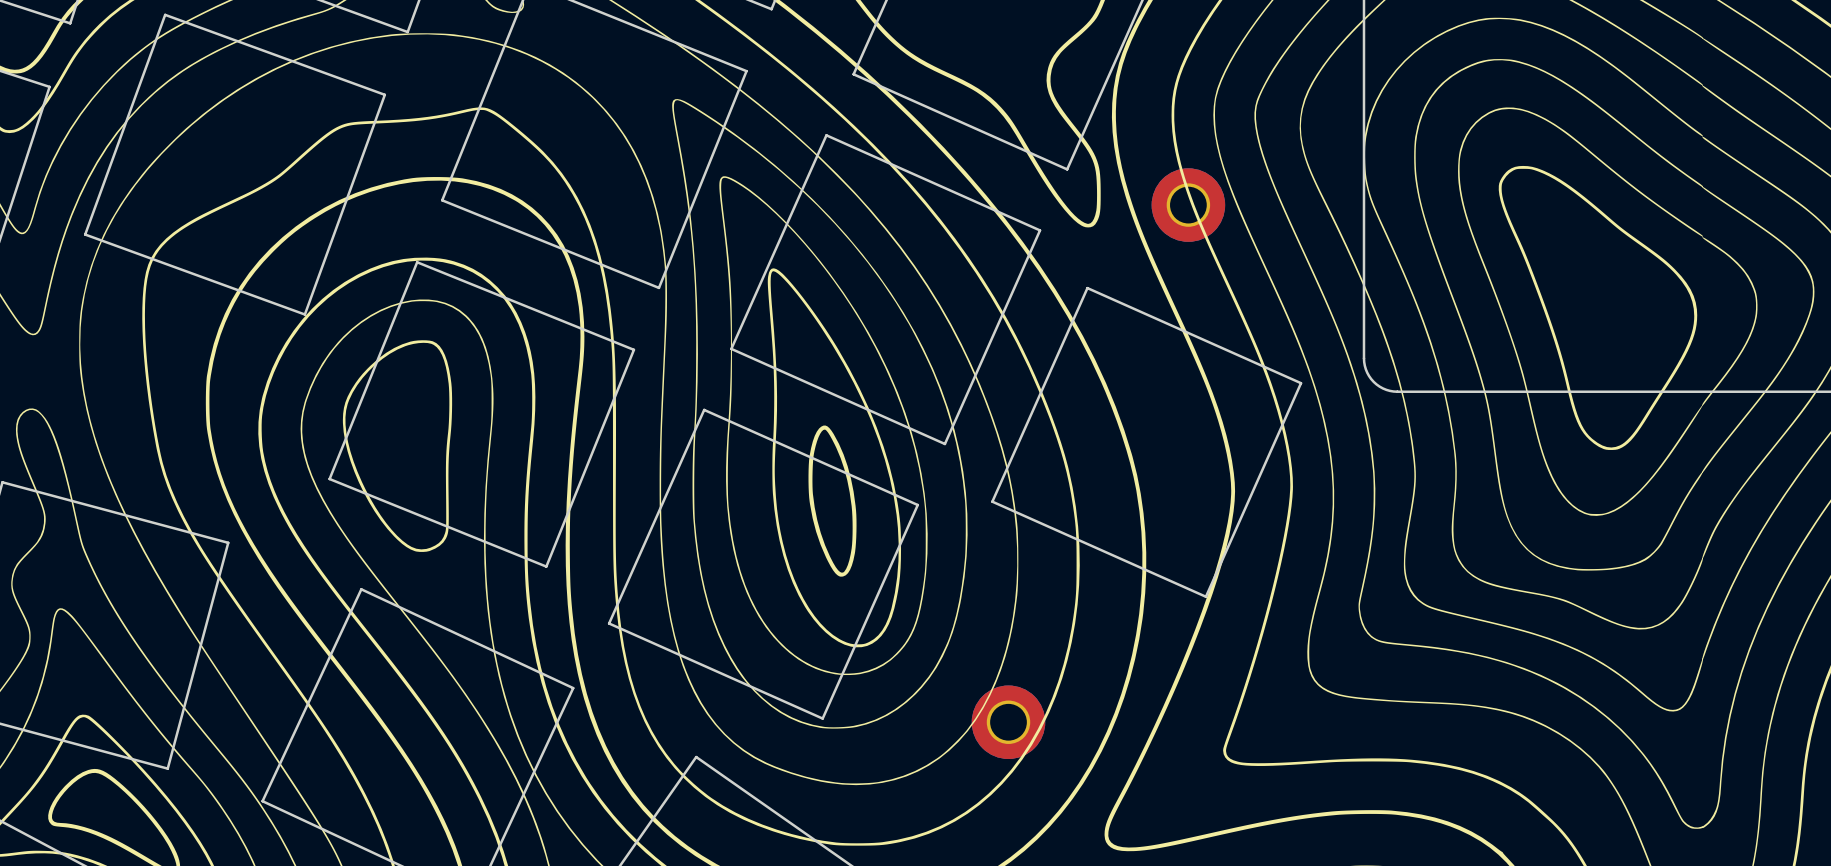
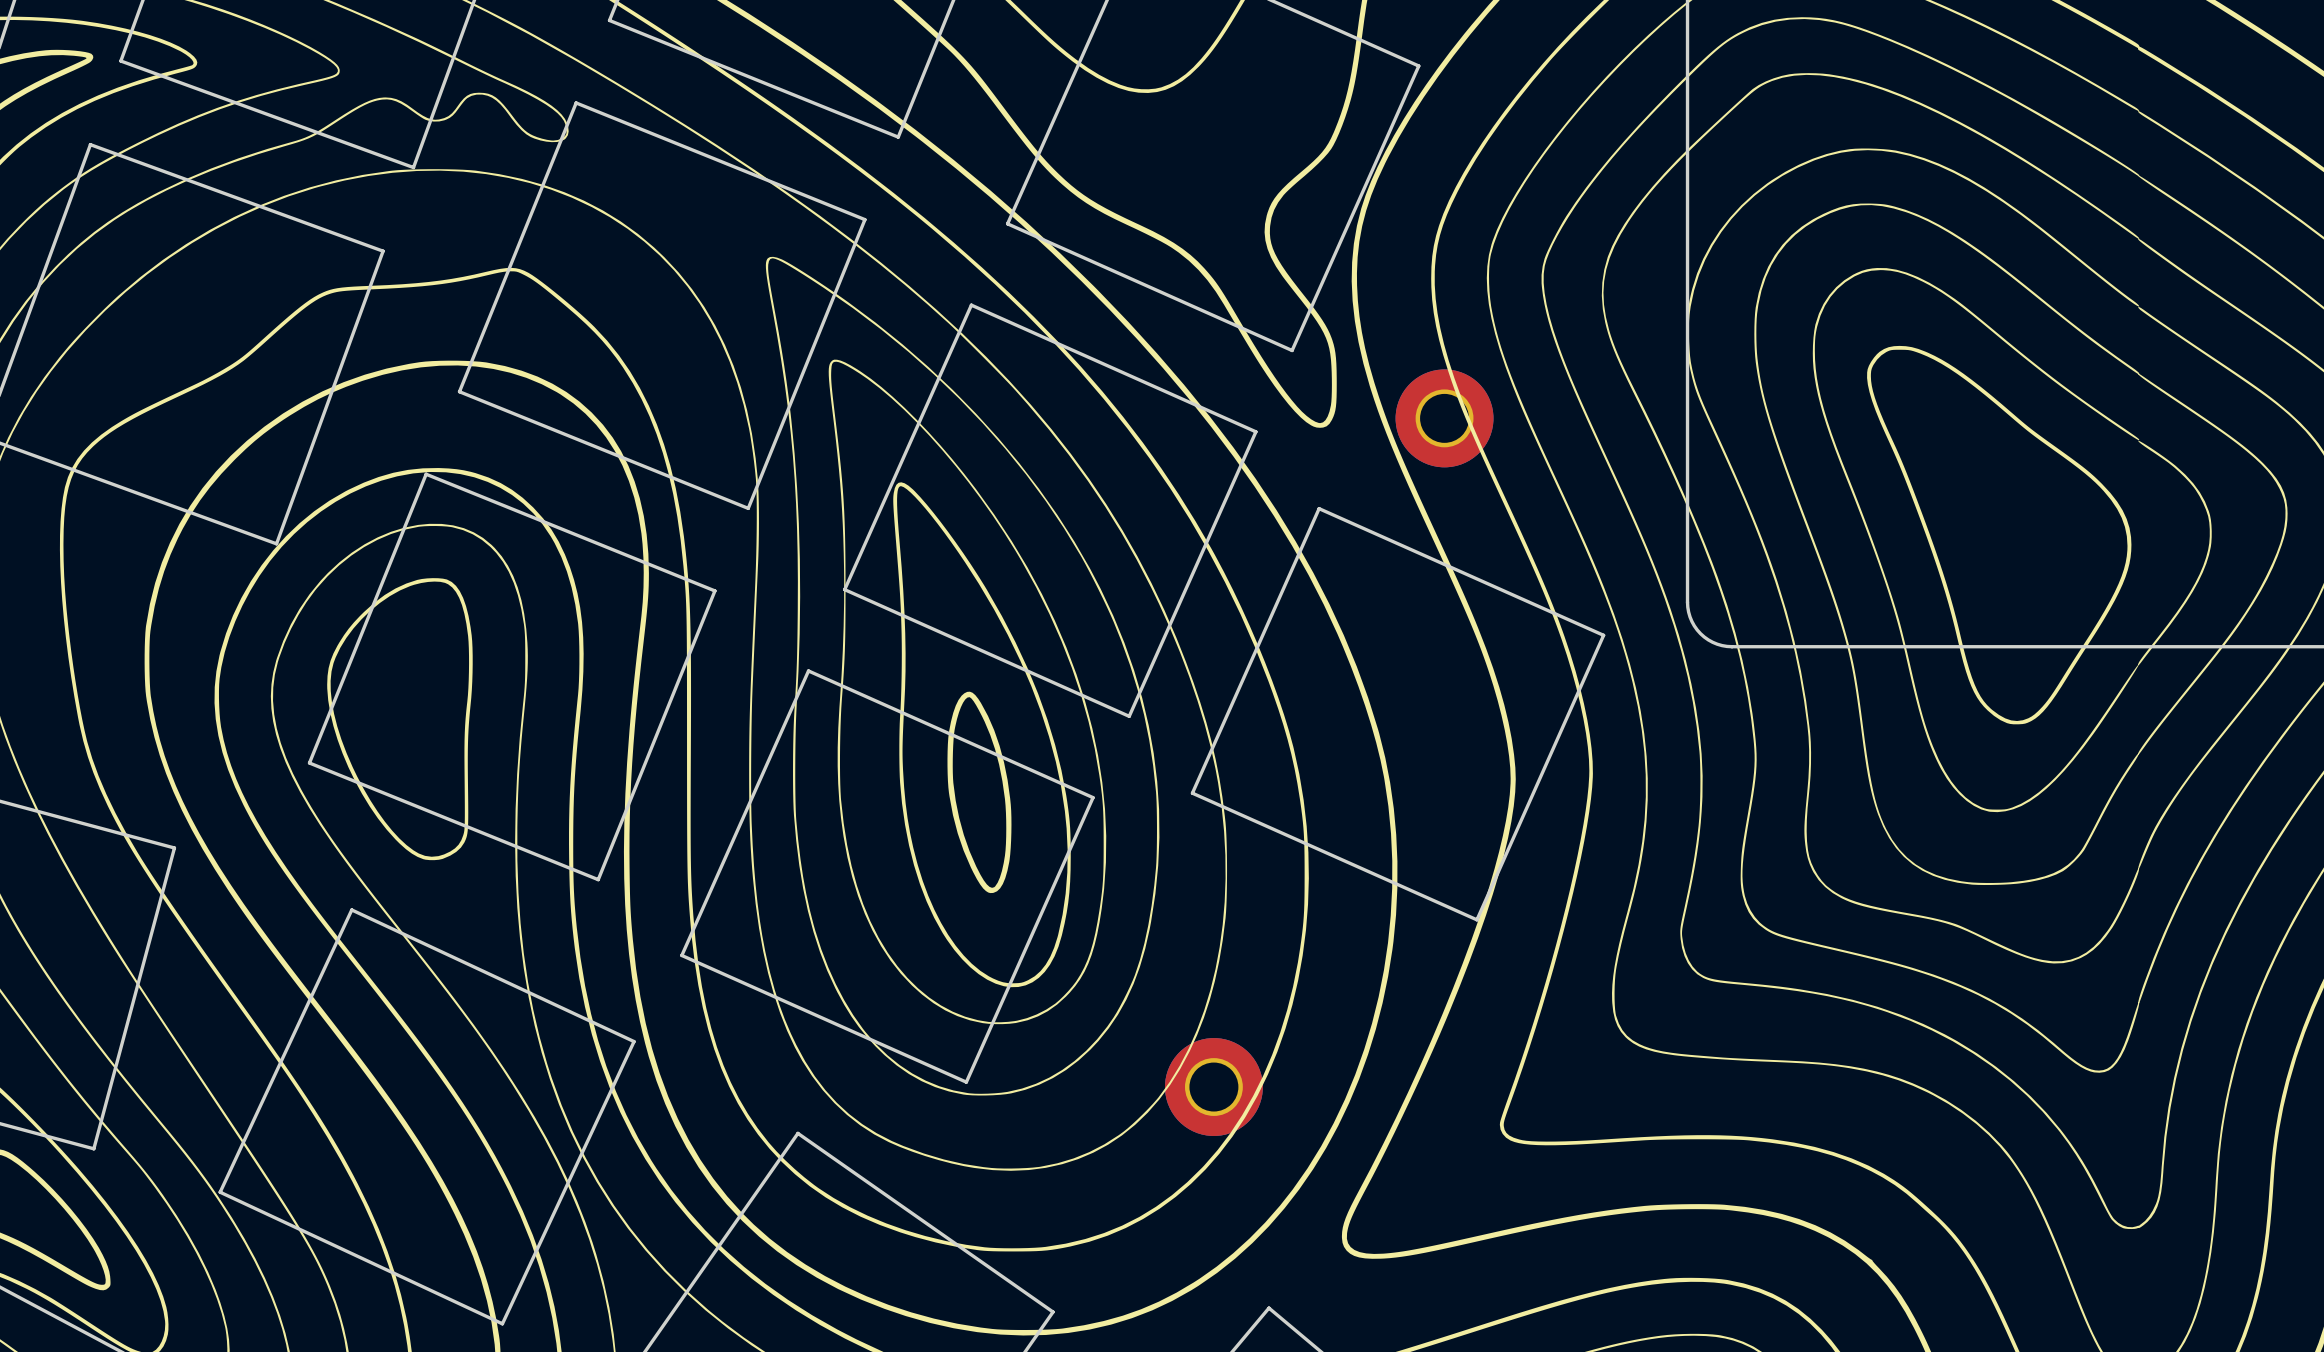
part position: (1188, 205) -> (1444, 418)

